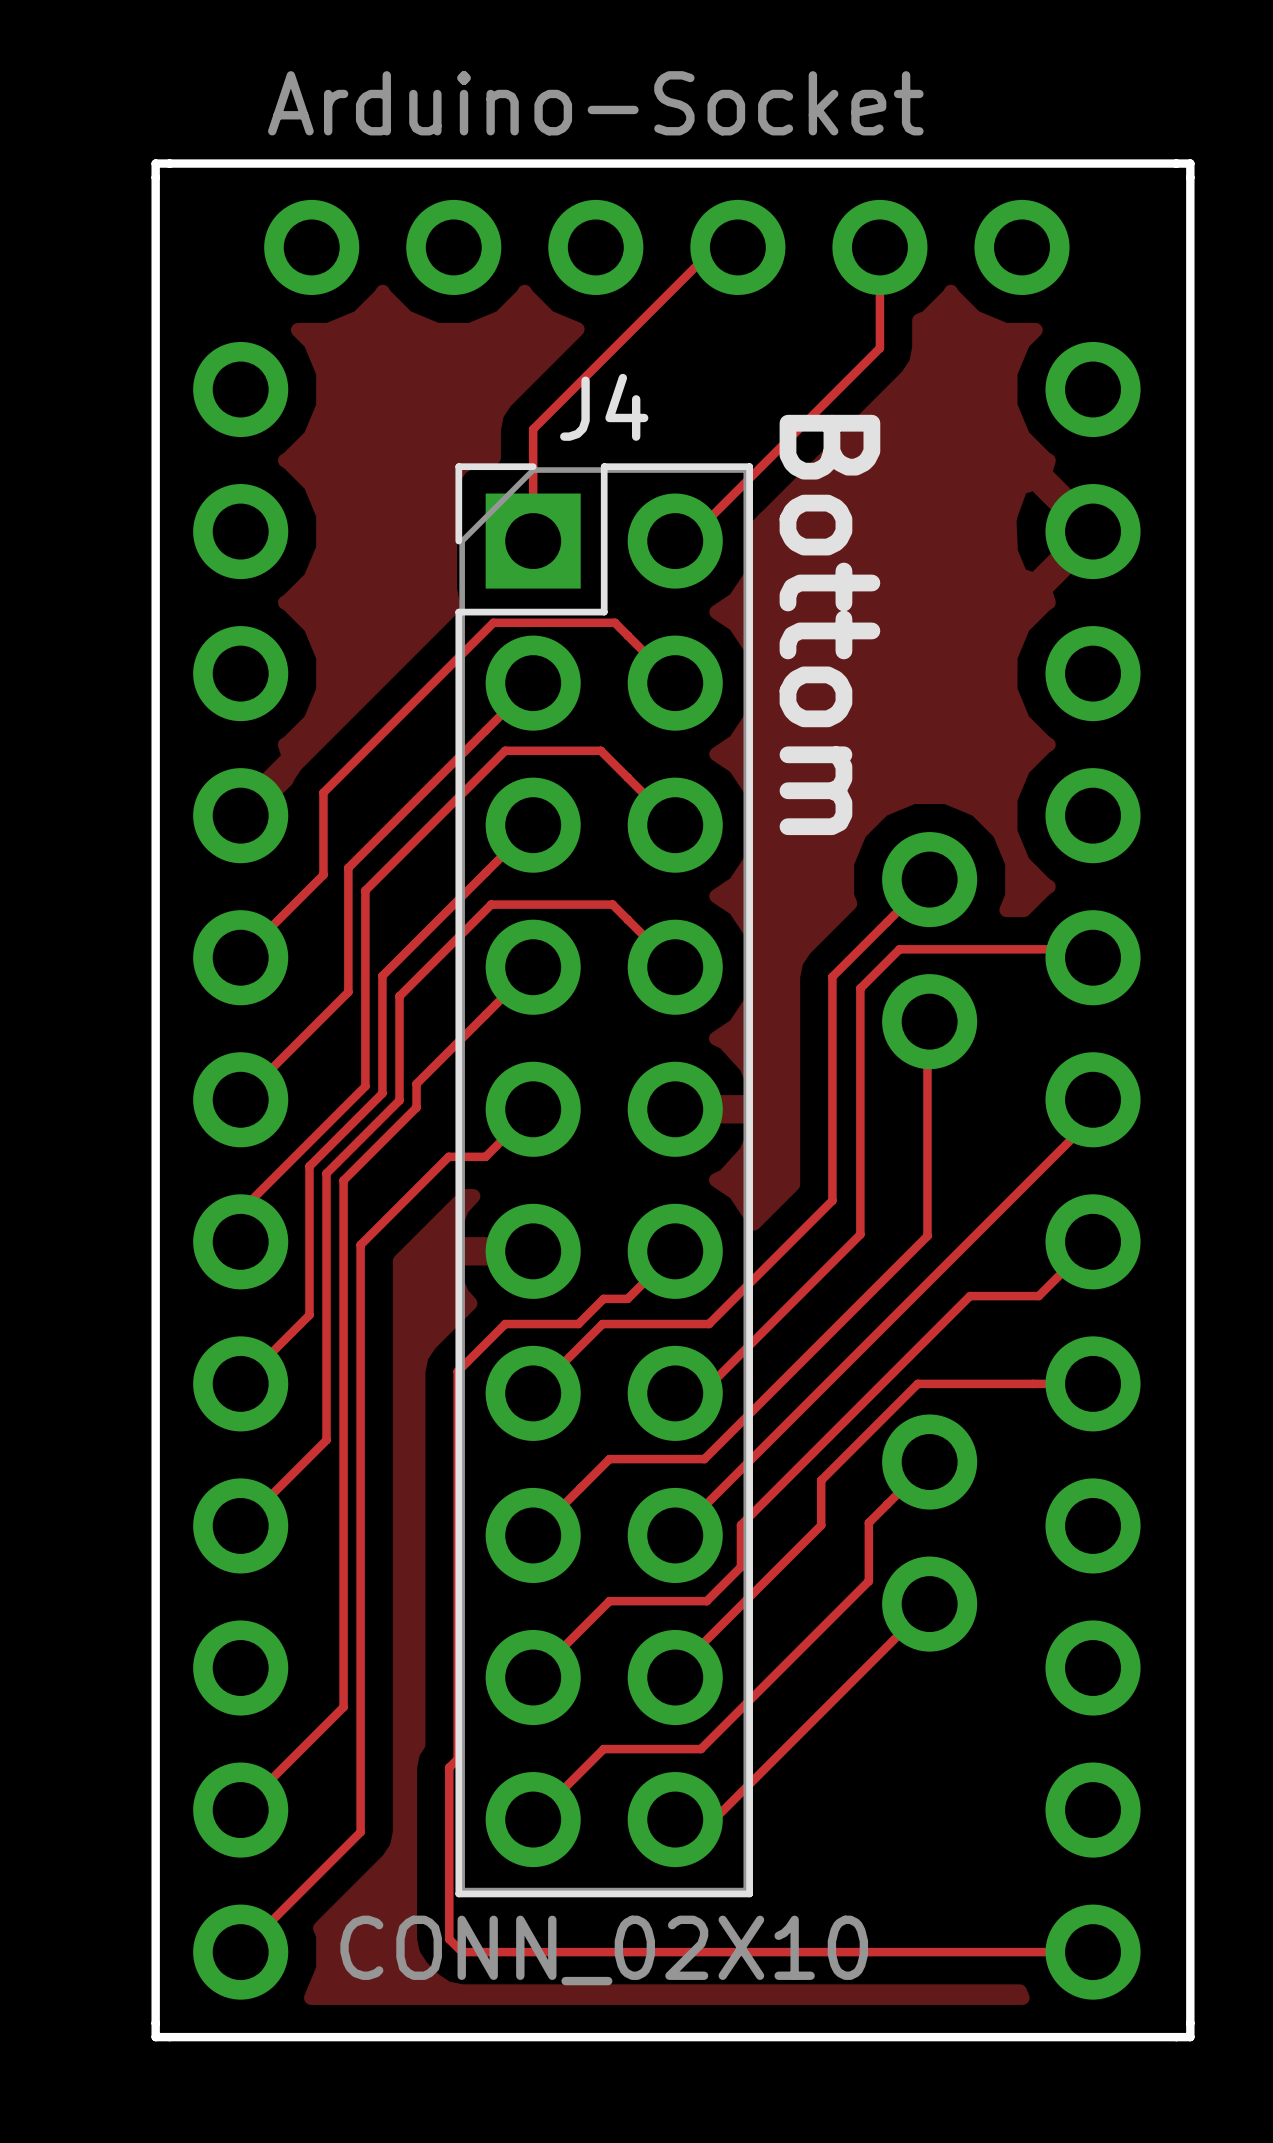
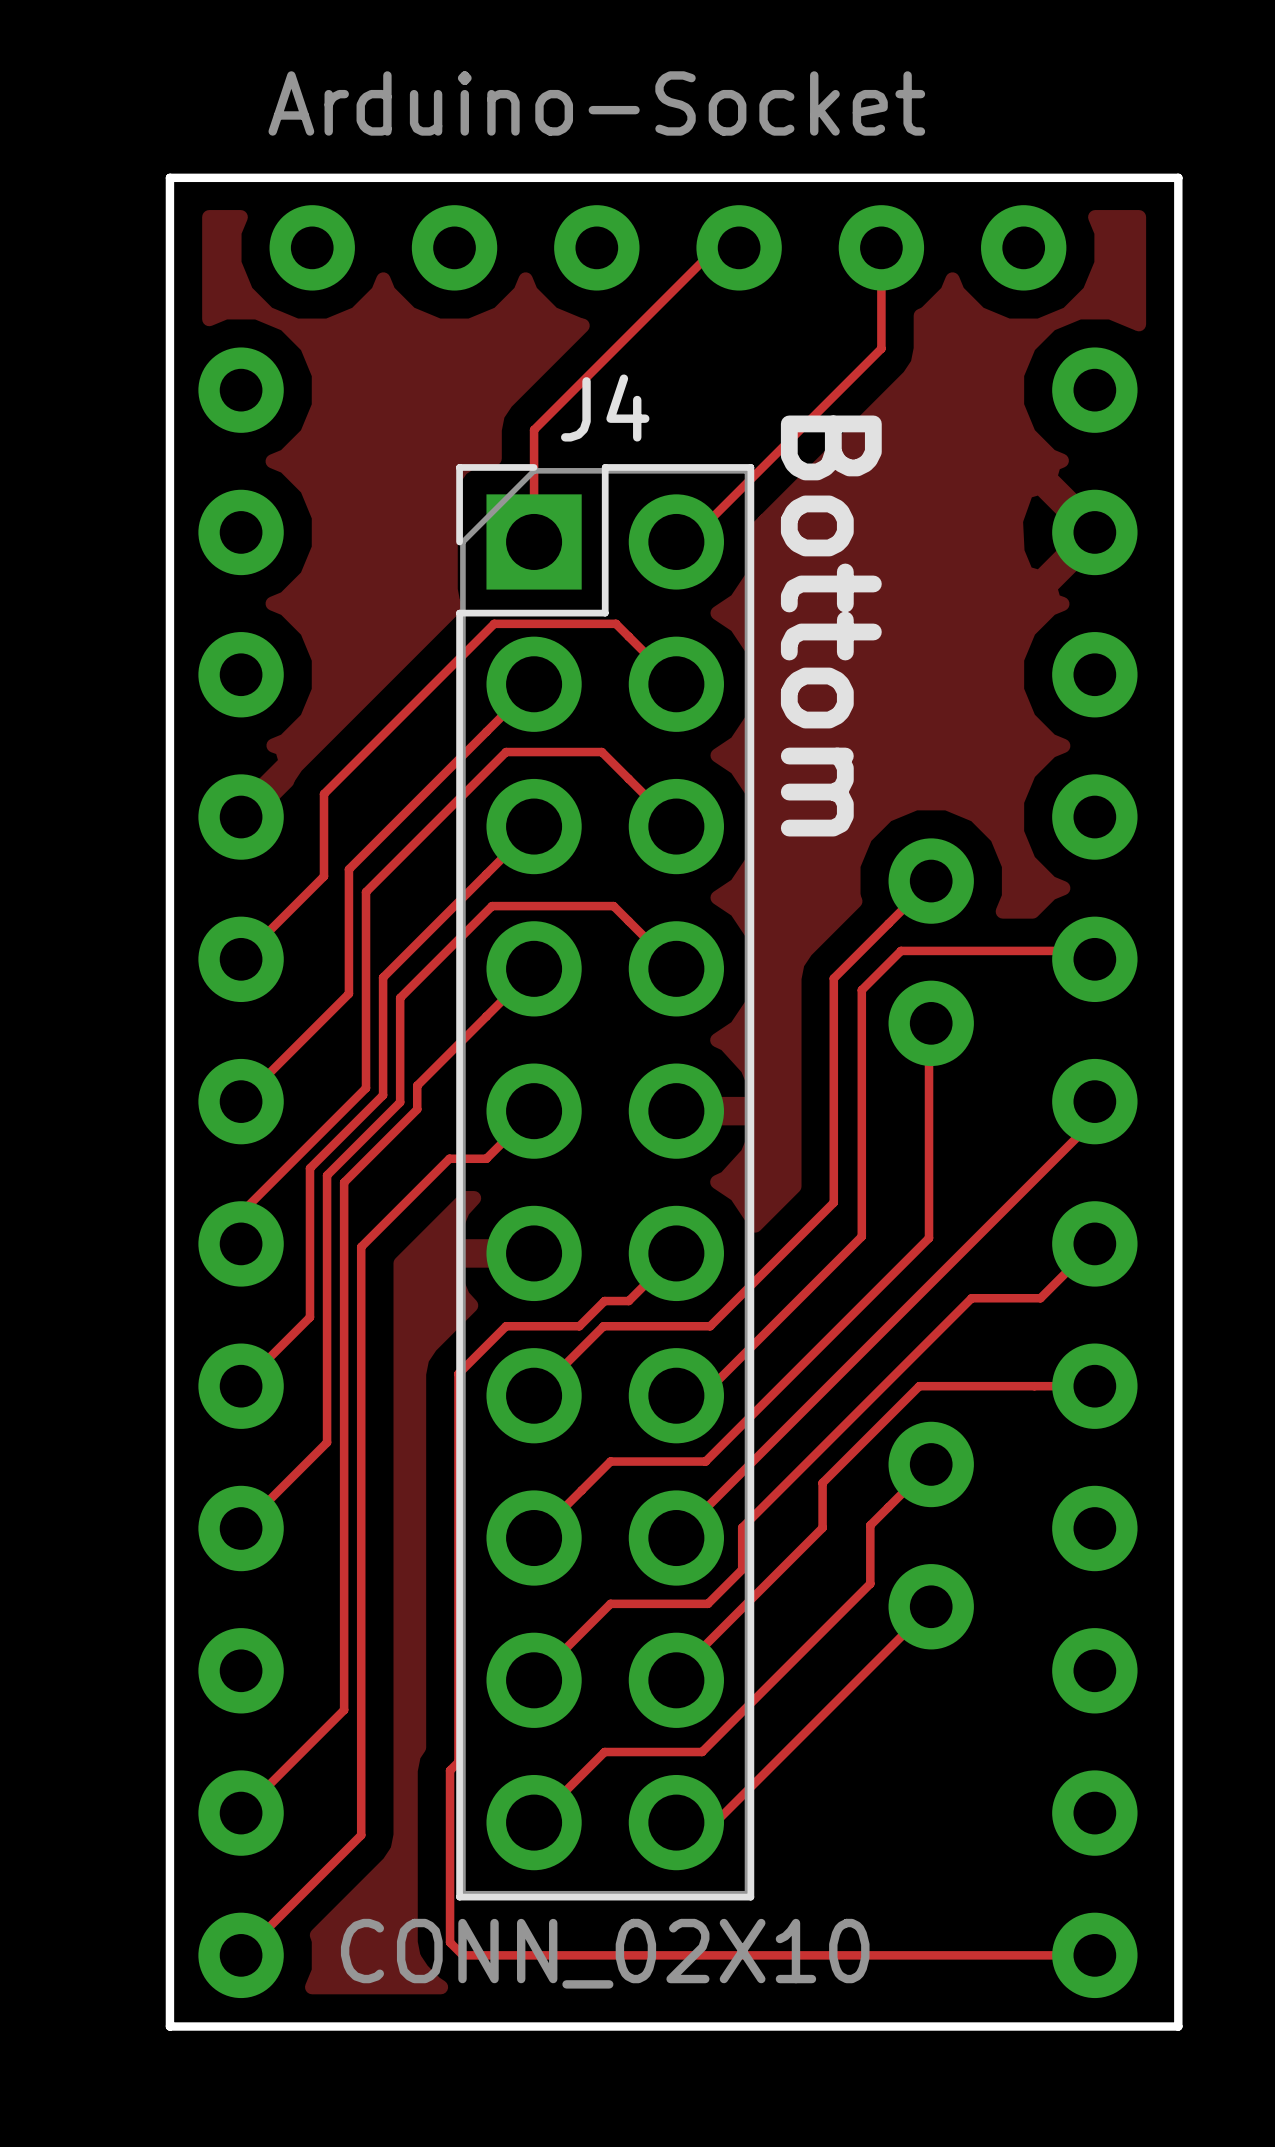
board edge: (155, 163) (1190, 163) (1190, 2037) (155, 2037) (155, 163) -> (169, 177) (169, 2026) (1178, 2026) (1178, 177) (169, 177)
part footprint: [193, 199, 1141, 2000] -> [198, 205, 1138, 1999]

